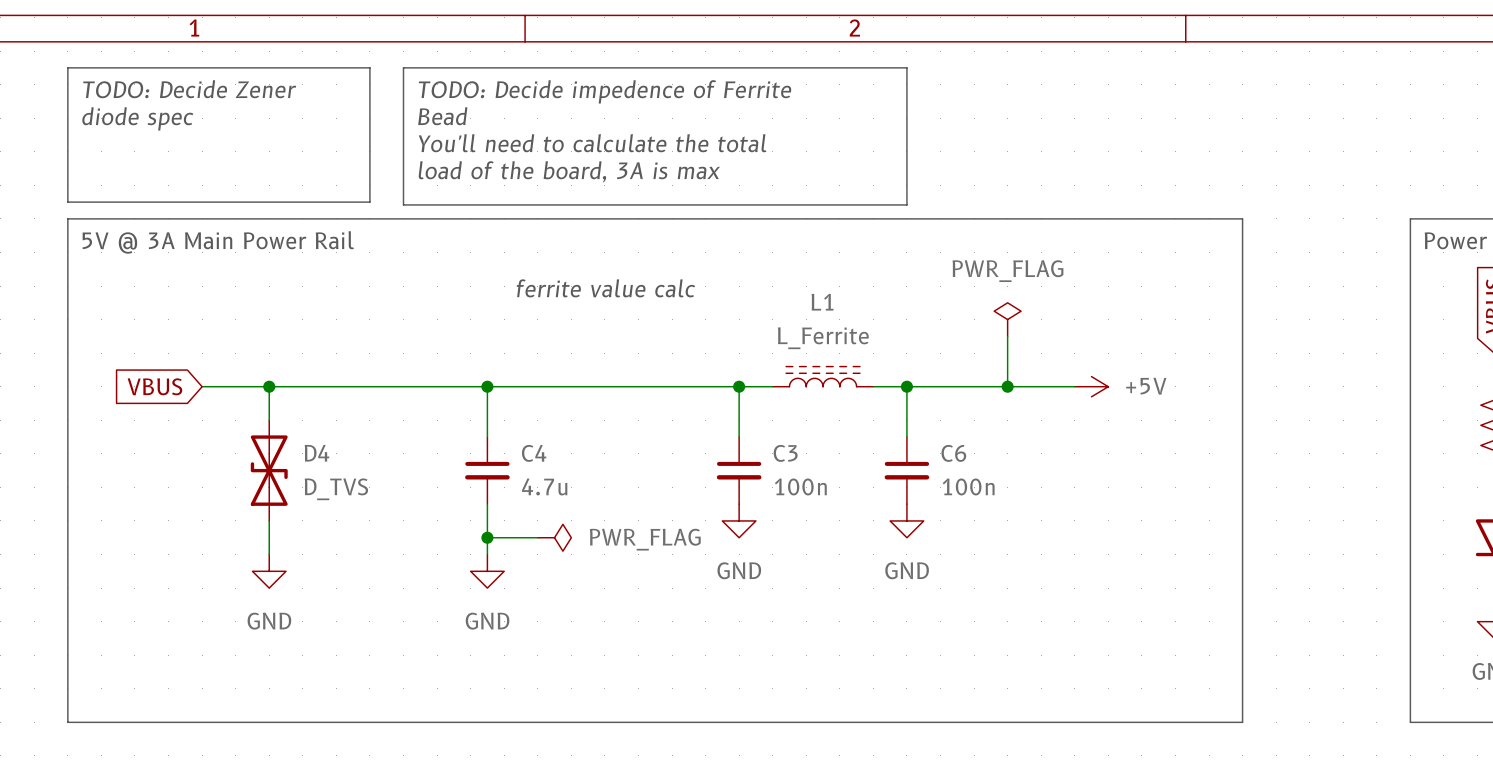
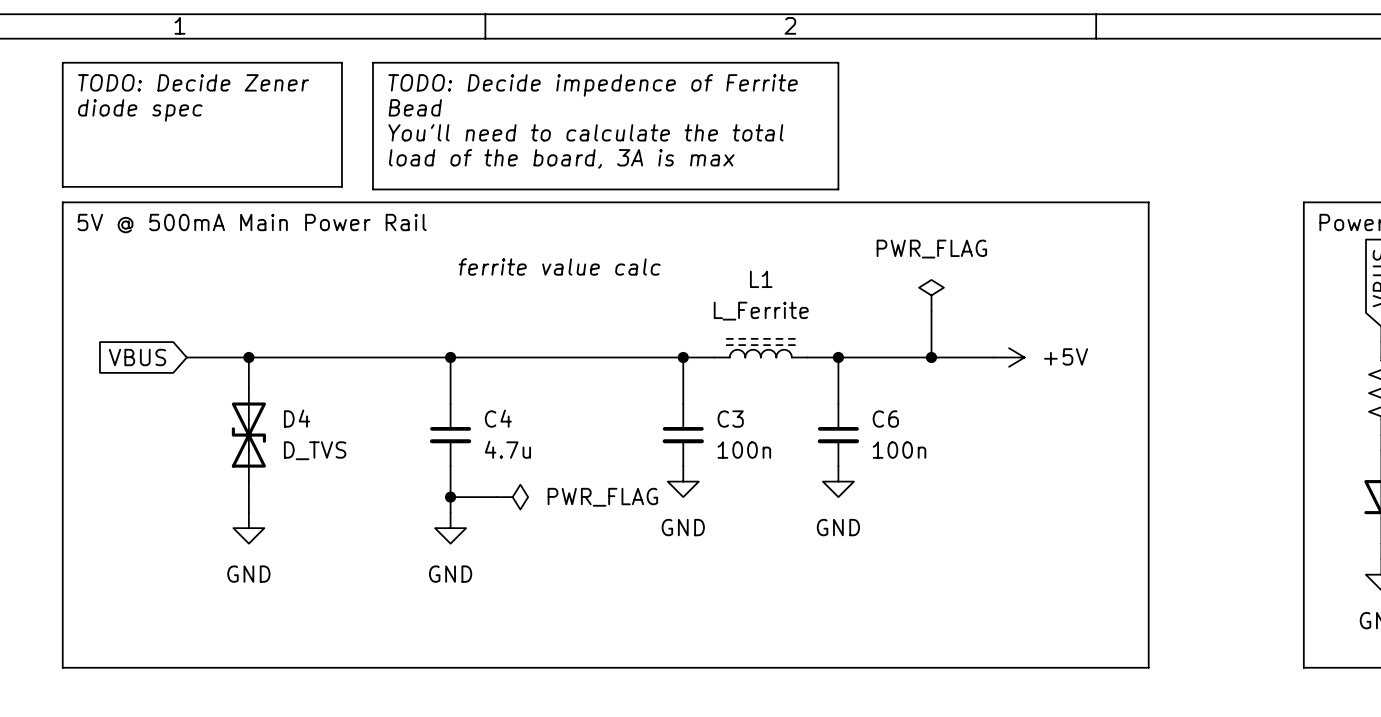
text: 5V @ 3A Main Power Rail (218, 242) -> 5V @ 500mA Main Power Rail (252, 223)

